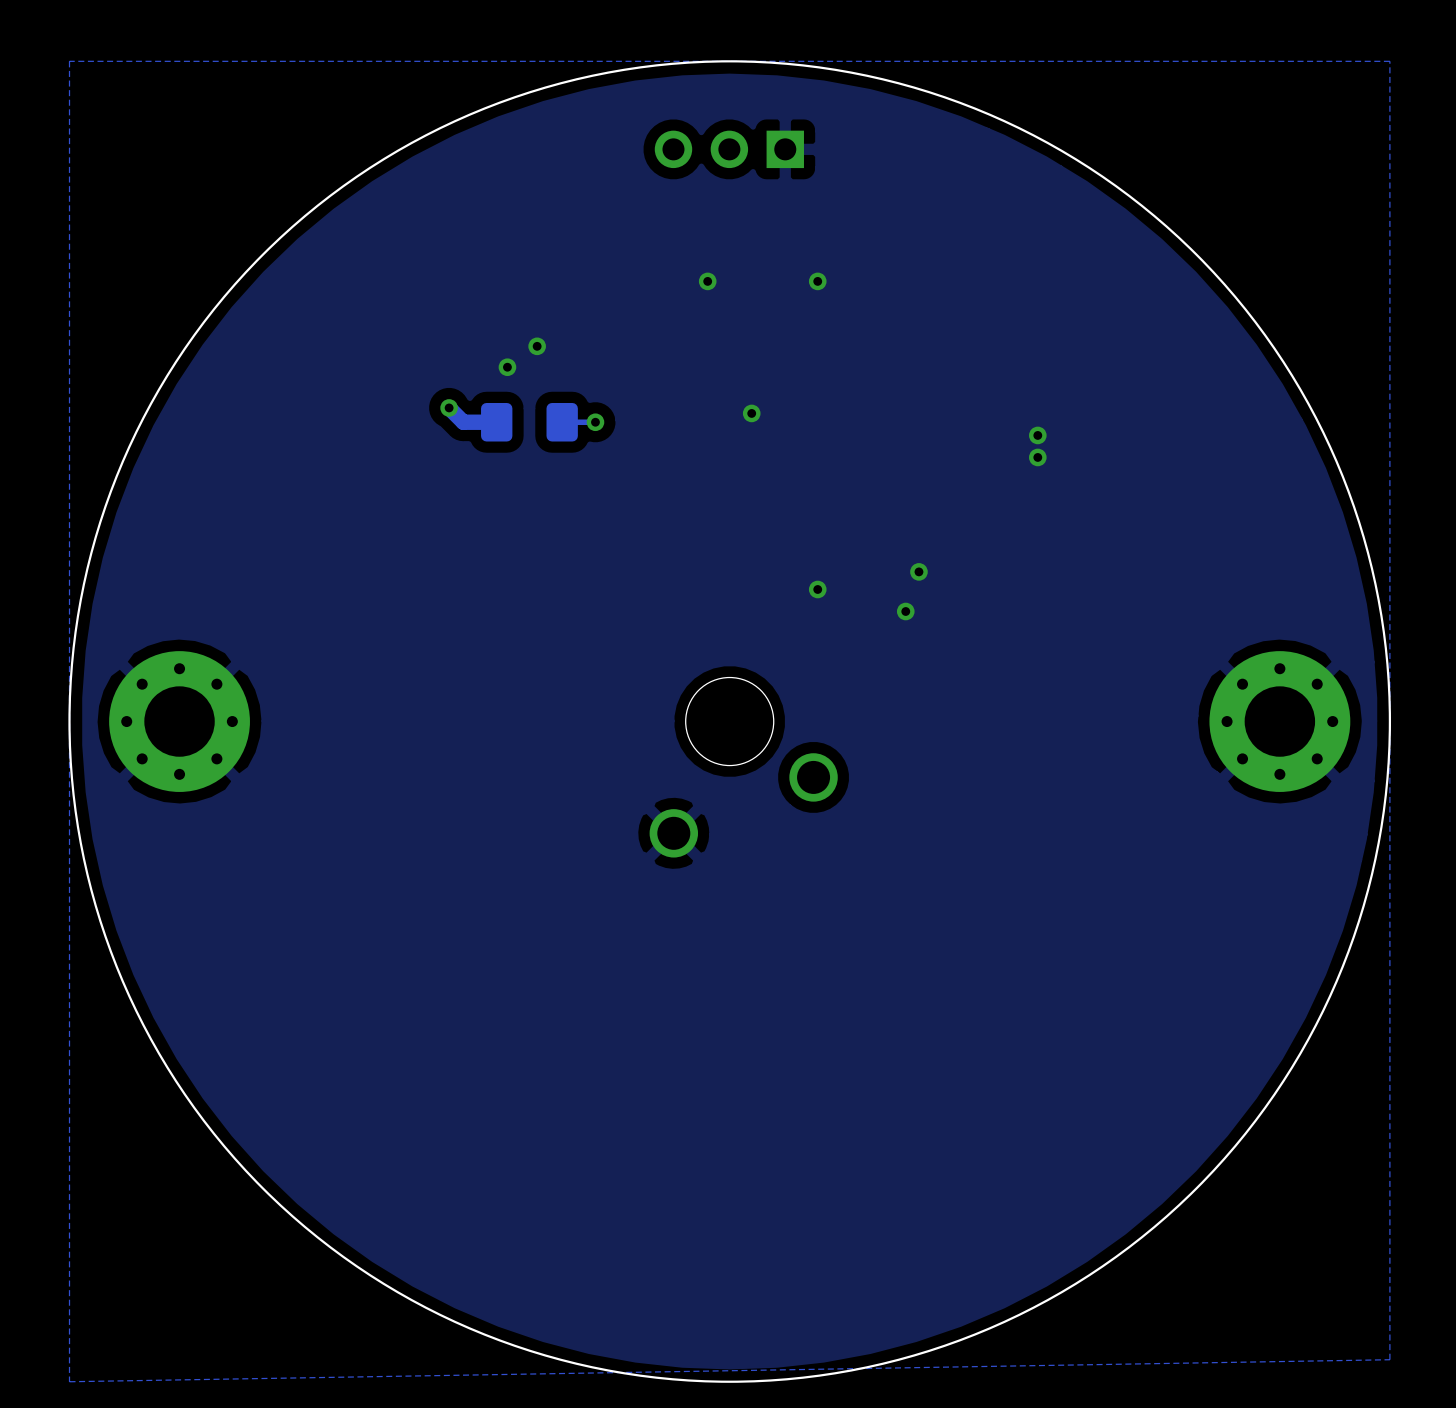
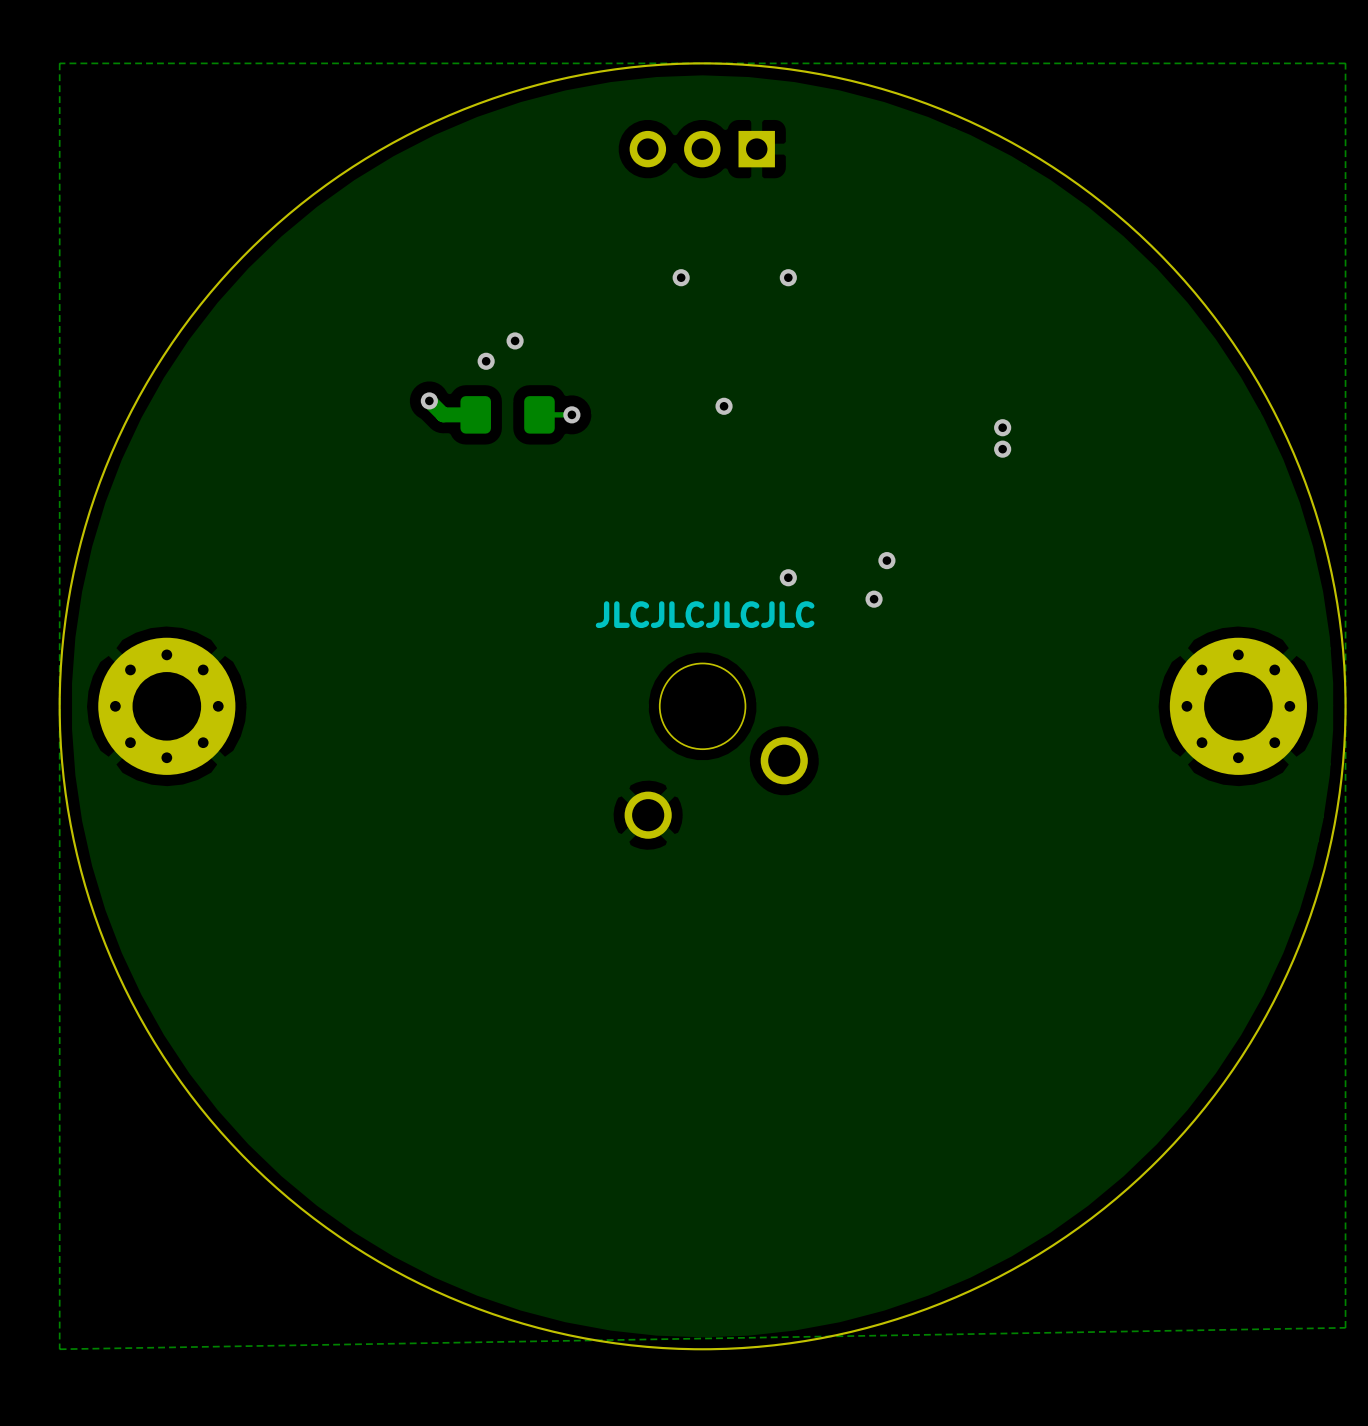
text: none -> JLCJLCJLCJLC (705, 614)

